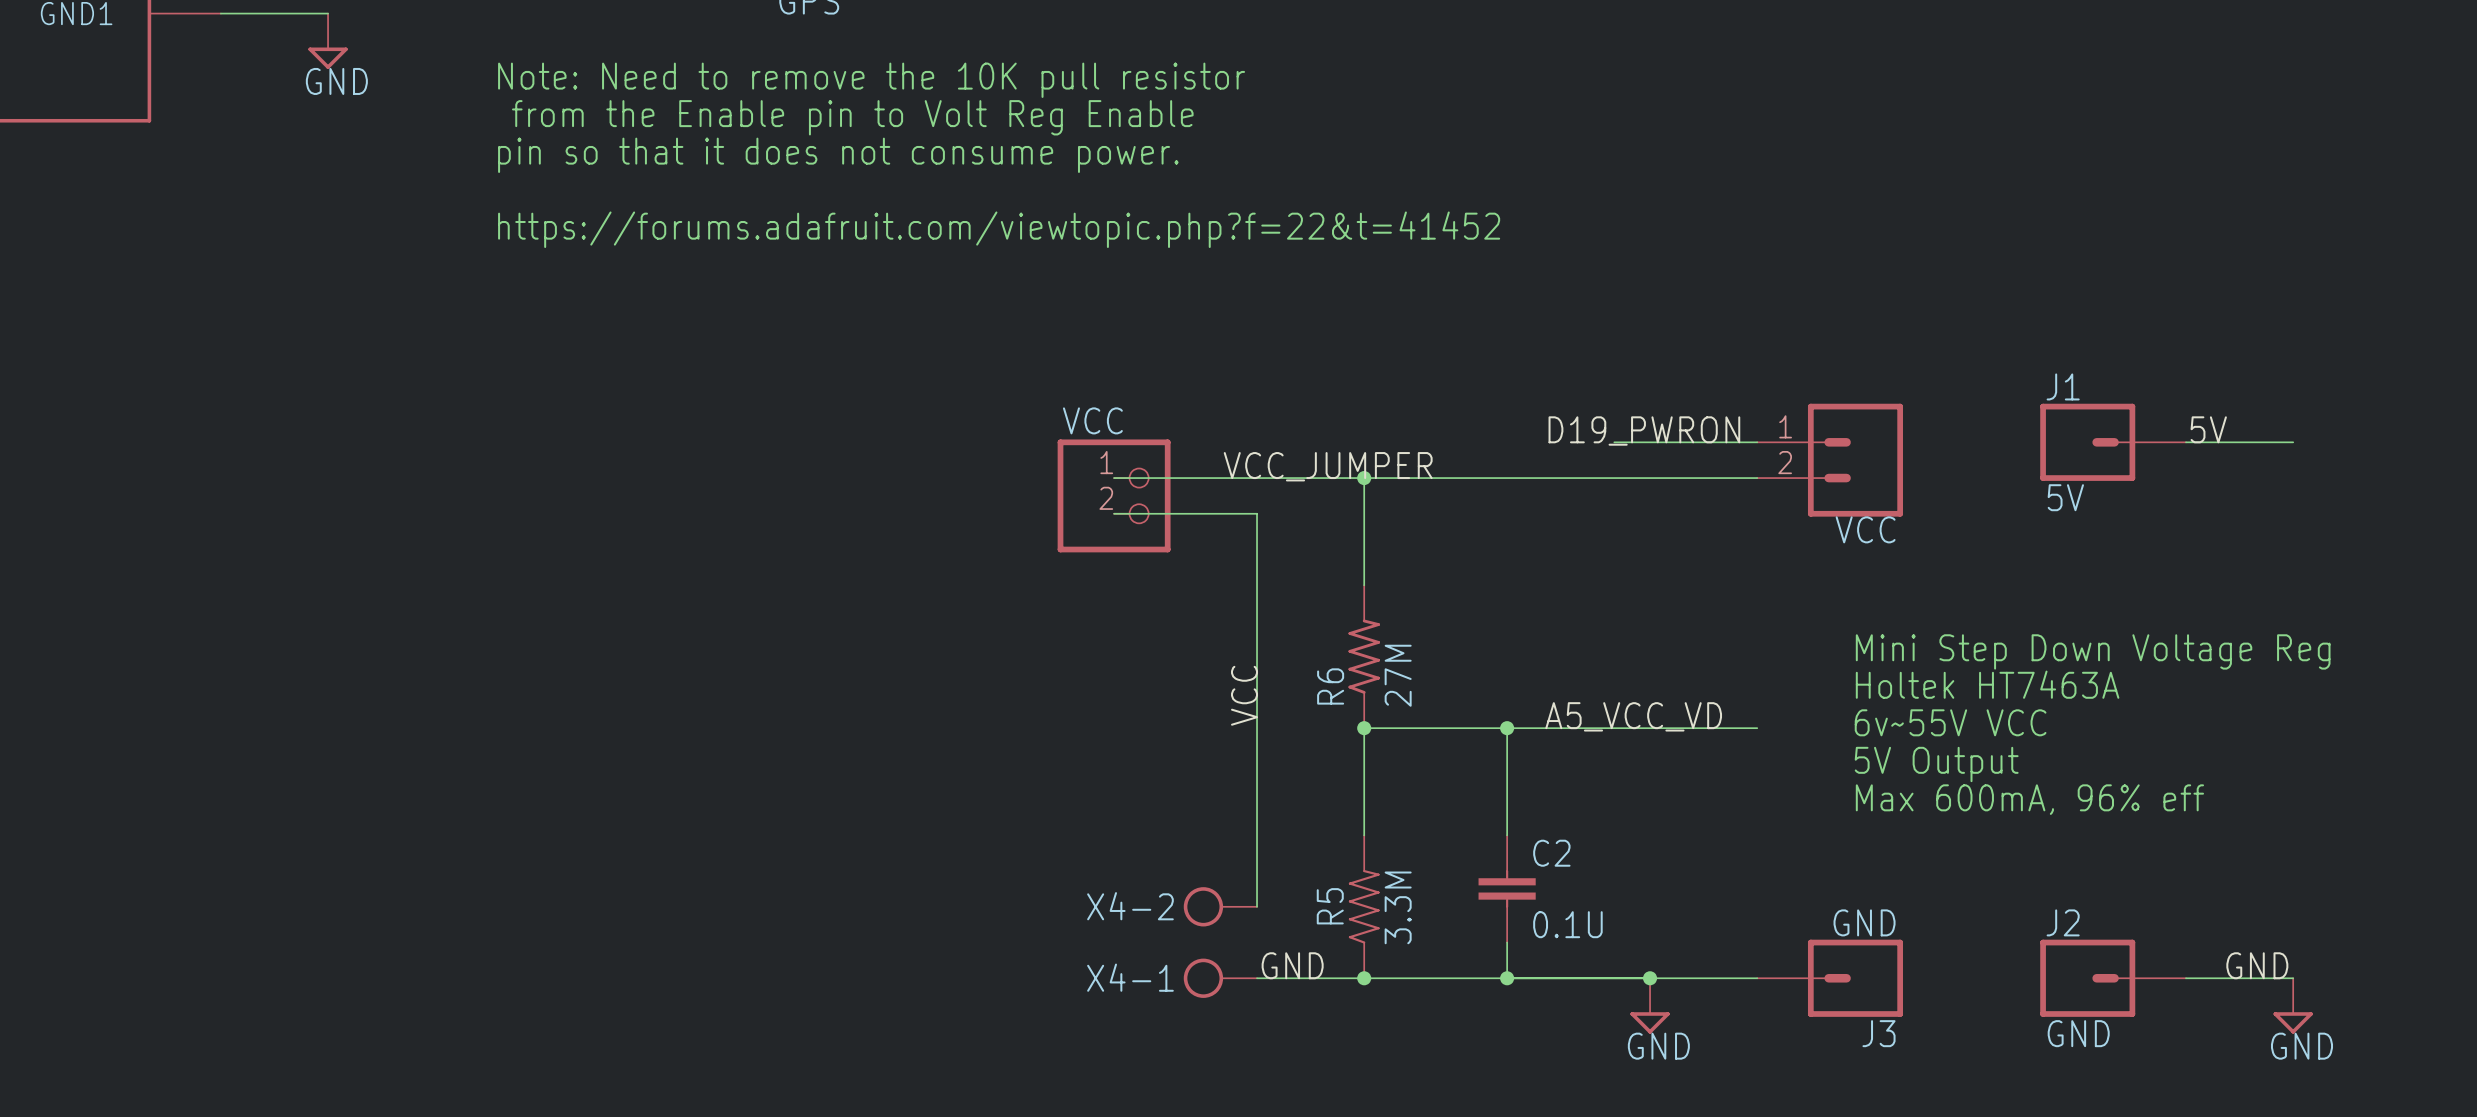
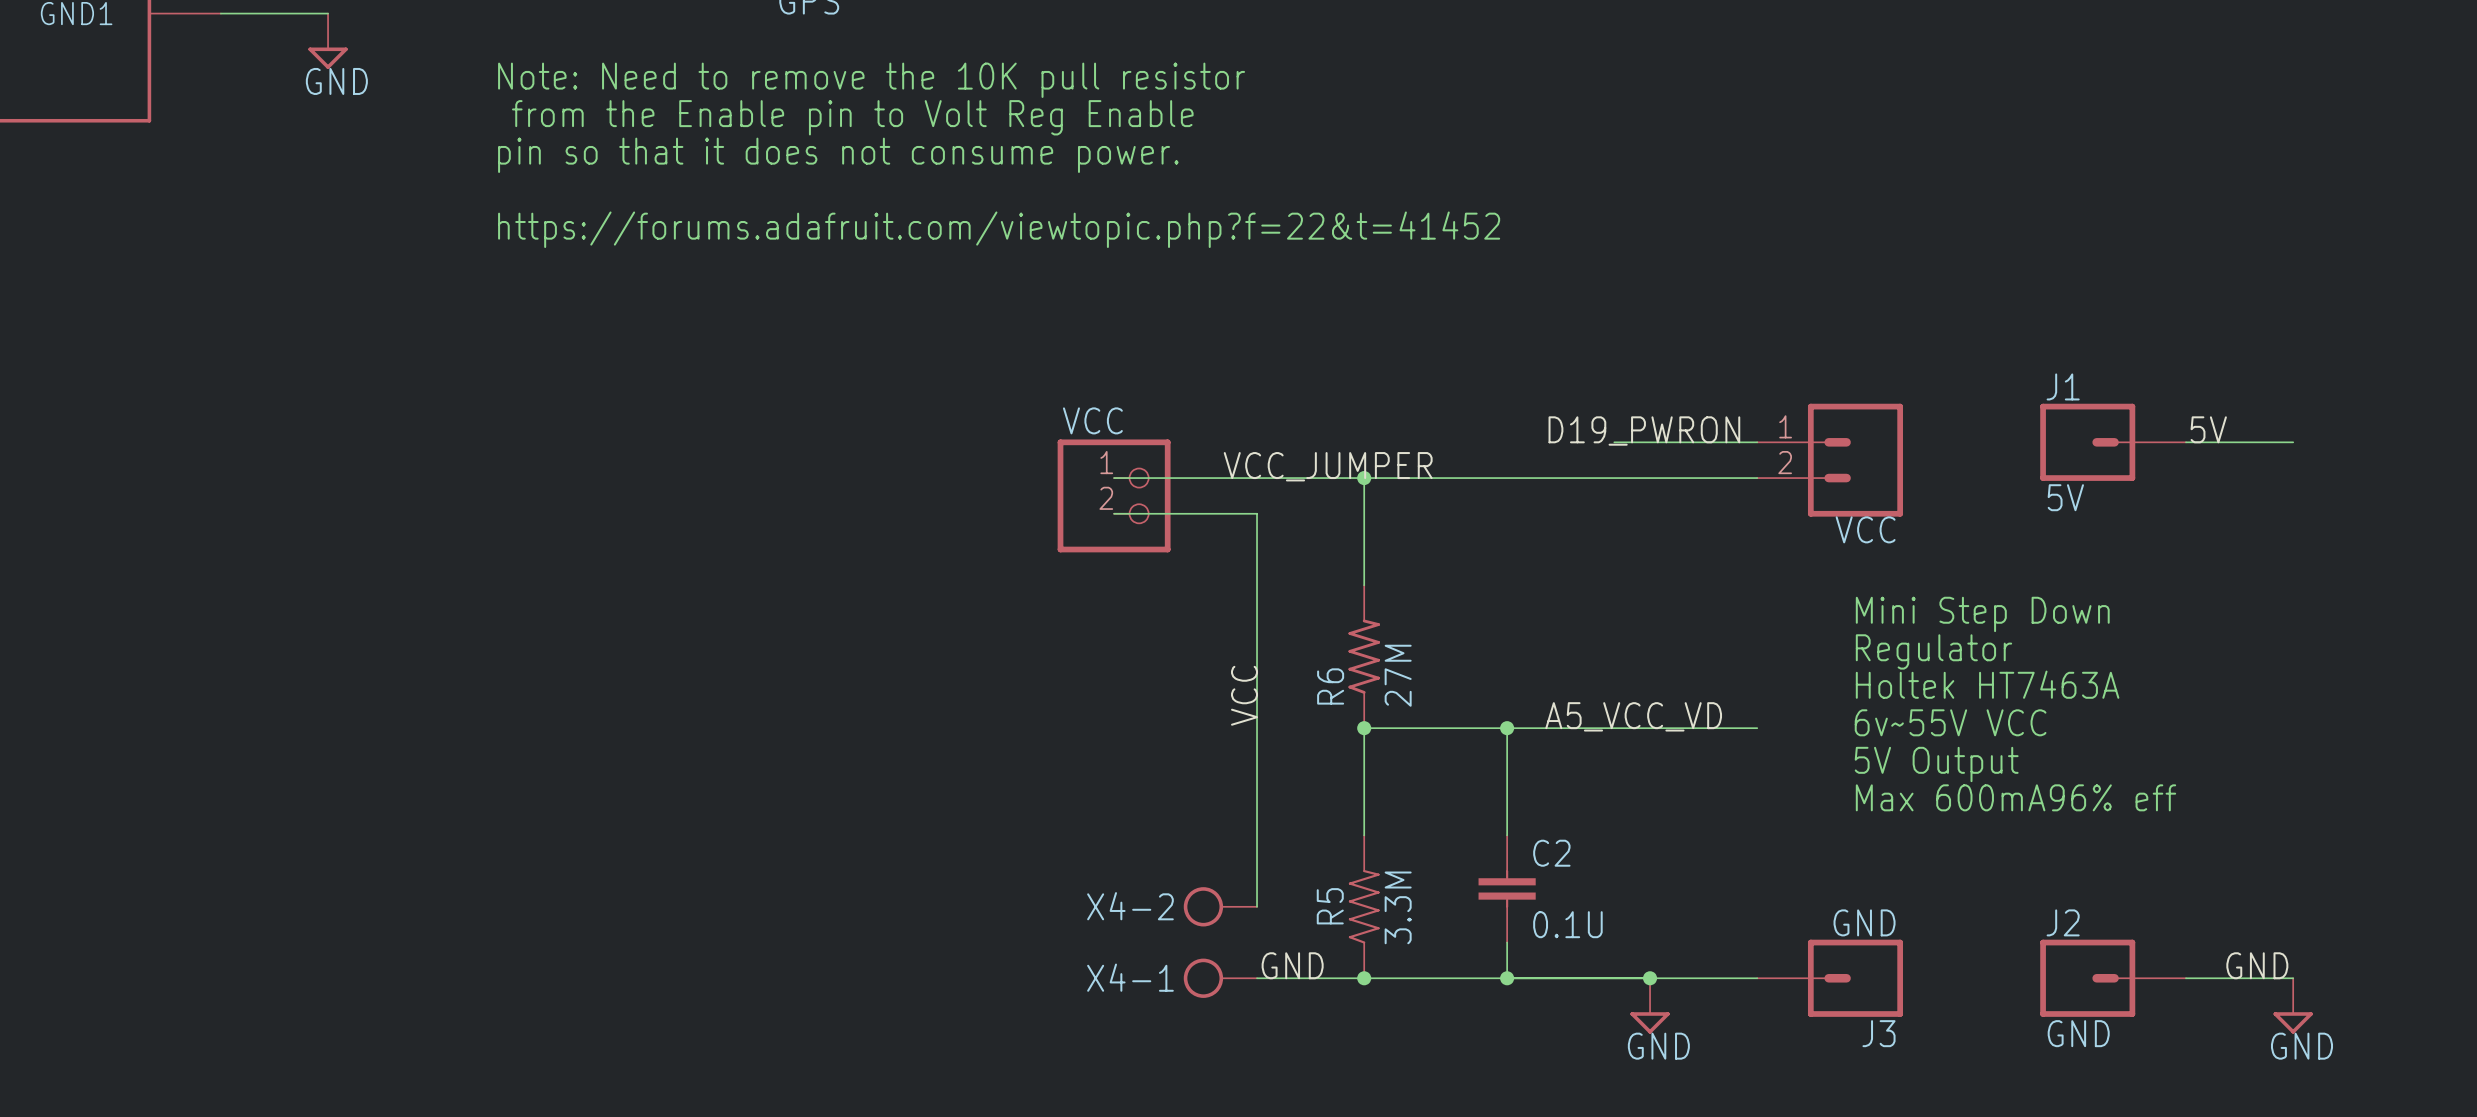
text: none -> Mini Step Down (1982, 614)
text: Mini Step Down Voltage Reg (2093, 651) -> Regulator (1933, 651)
text: Max 600mA, 96% eff (2029, 799) -> Max 600mA96% eff (2015, 797)

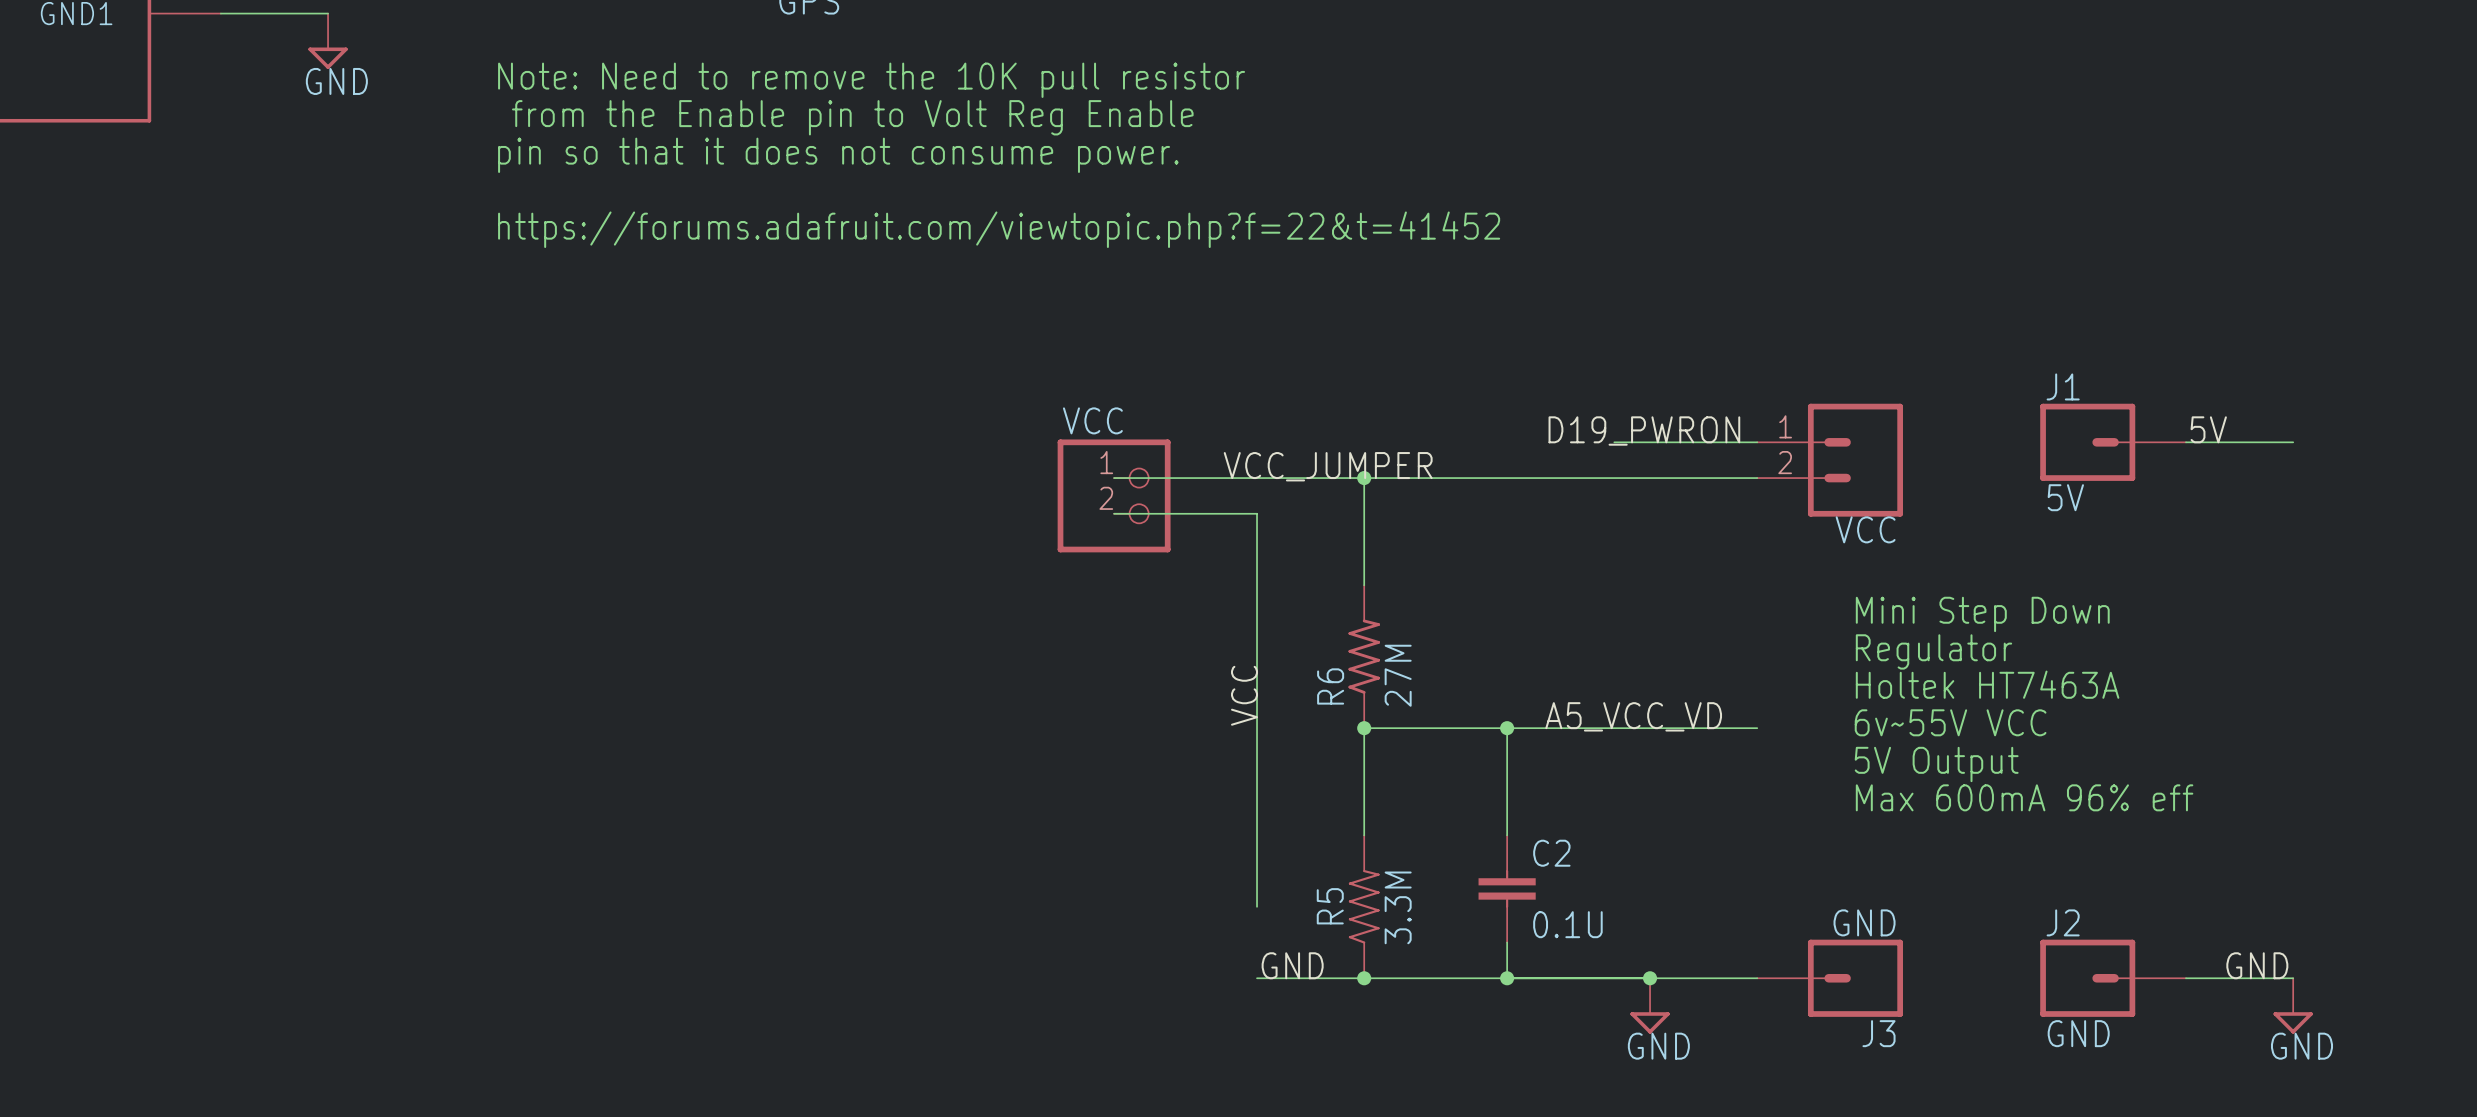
text: Max 600mA96% eff (2015, 797) -> Max 600mA 96% eff (2024, 797)
X4-2: (1220, 906) -> none
X4-1: (1220, 978) -> none

